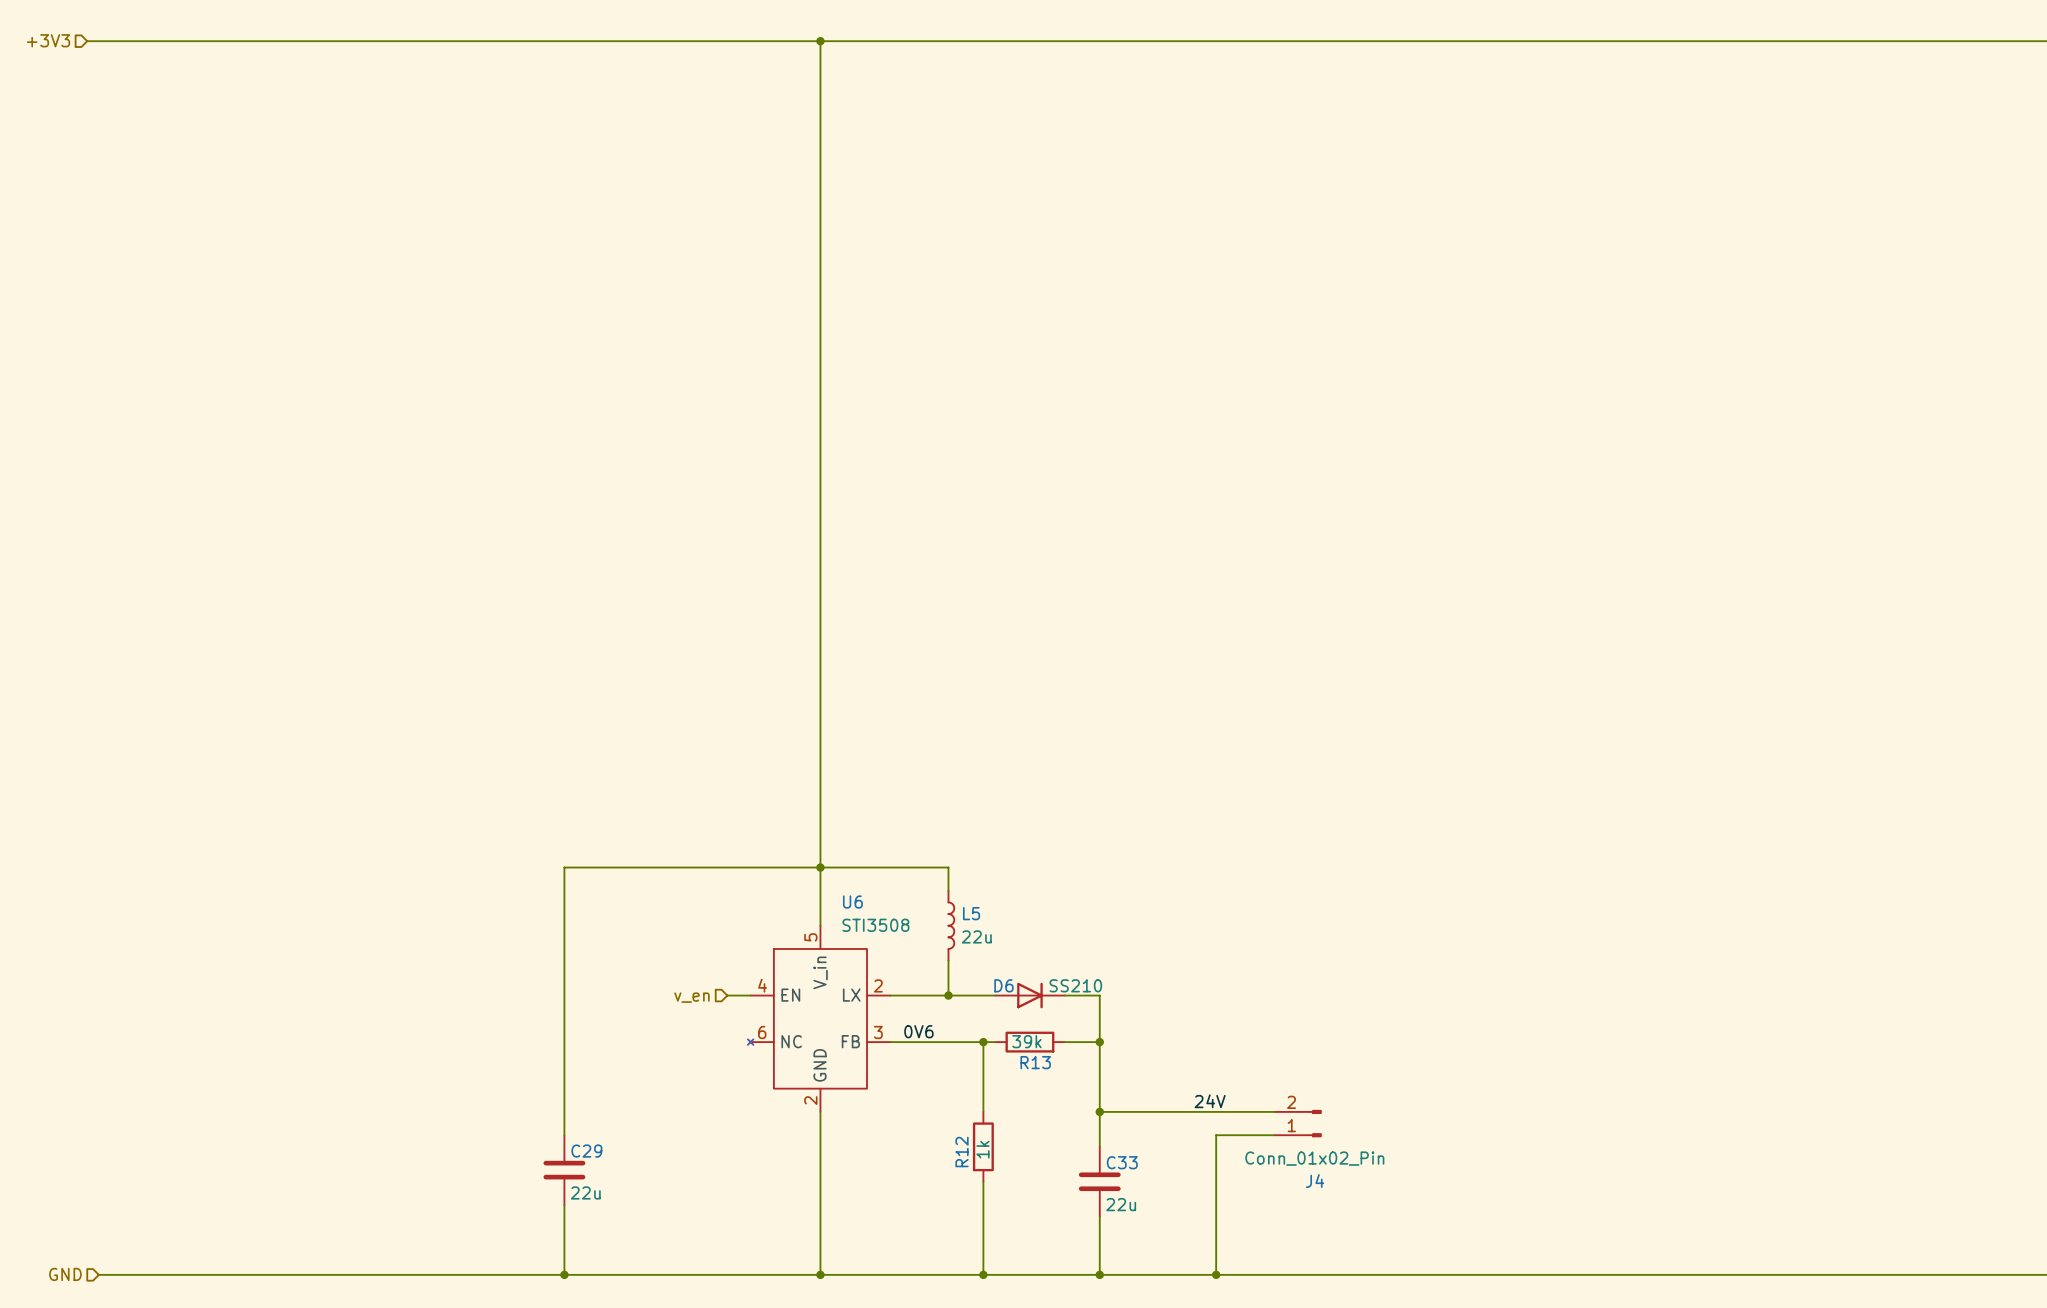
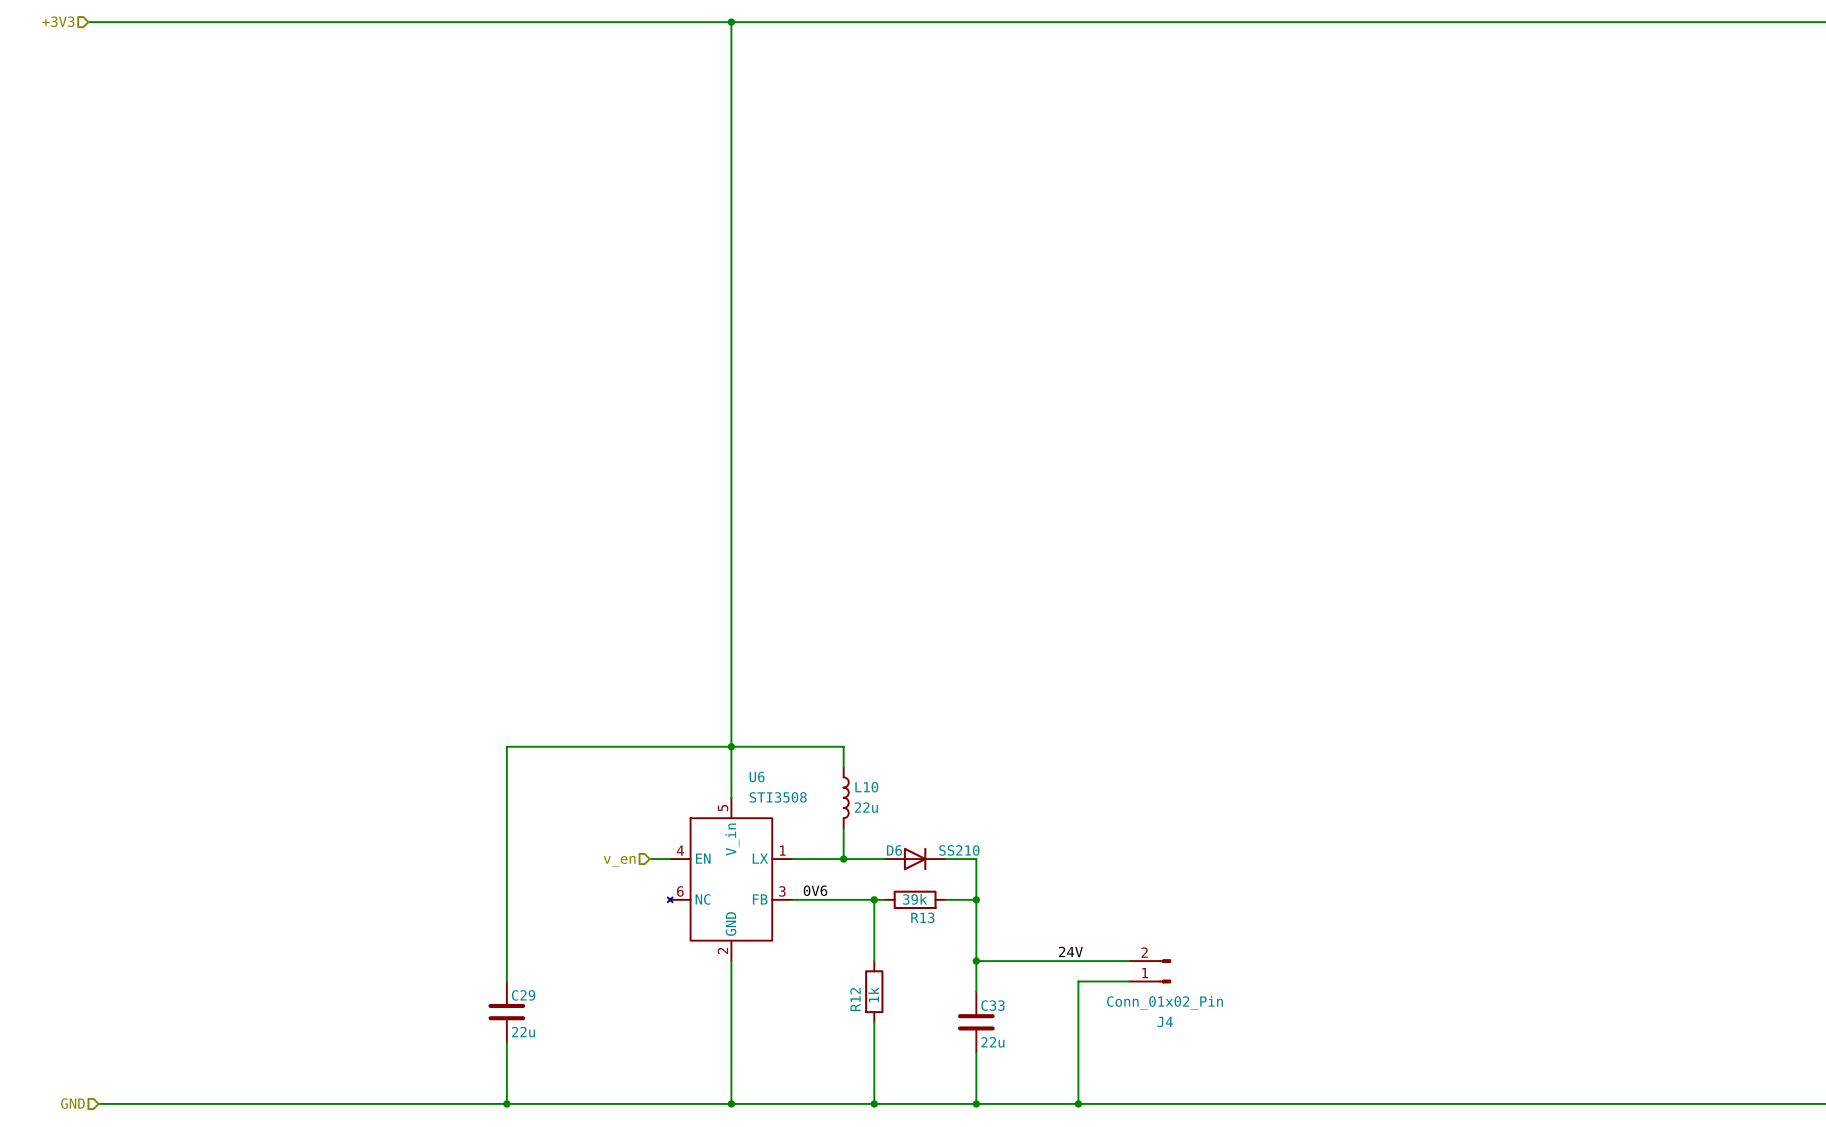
L5 name: L5 (971, 913) -> L10 (866, 787)
U6 pin number: 2 (878, 985) -> 1 (782, 850)

